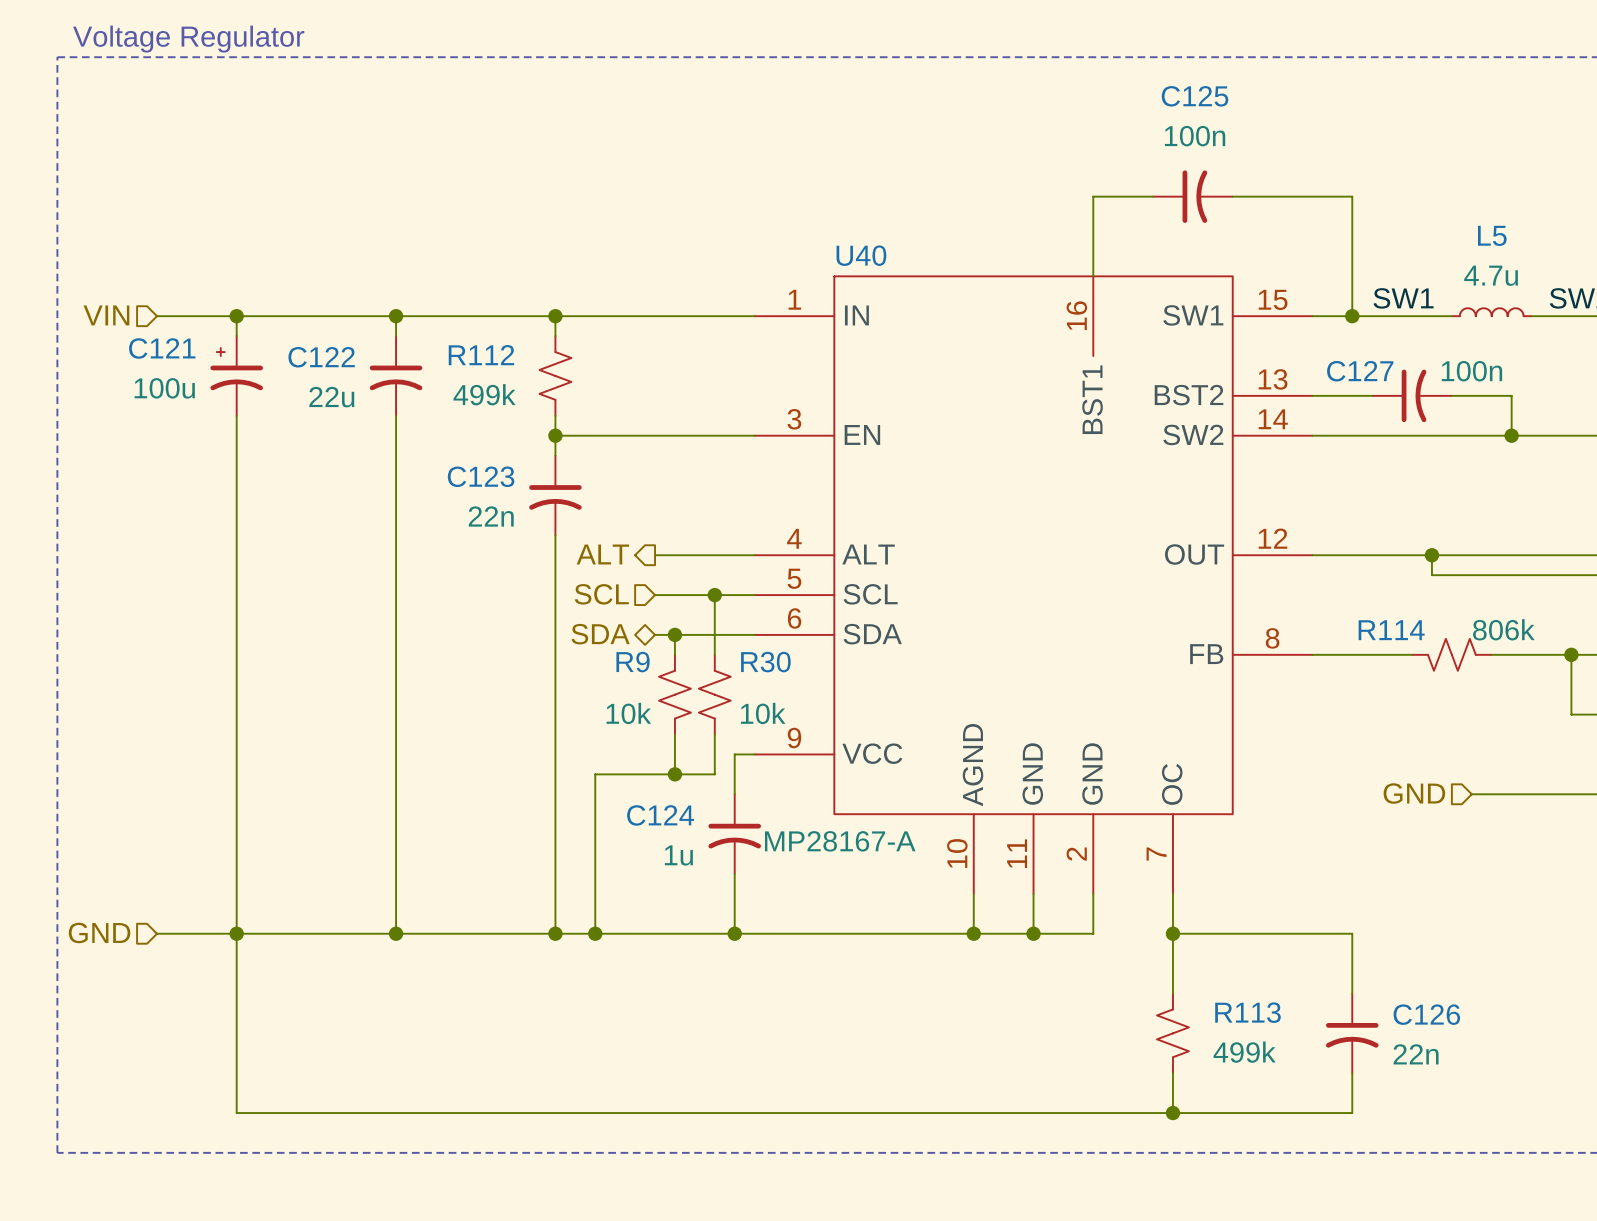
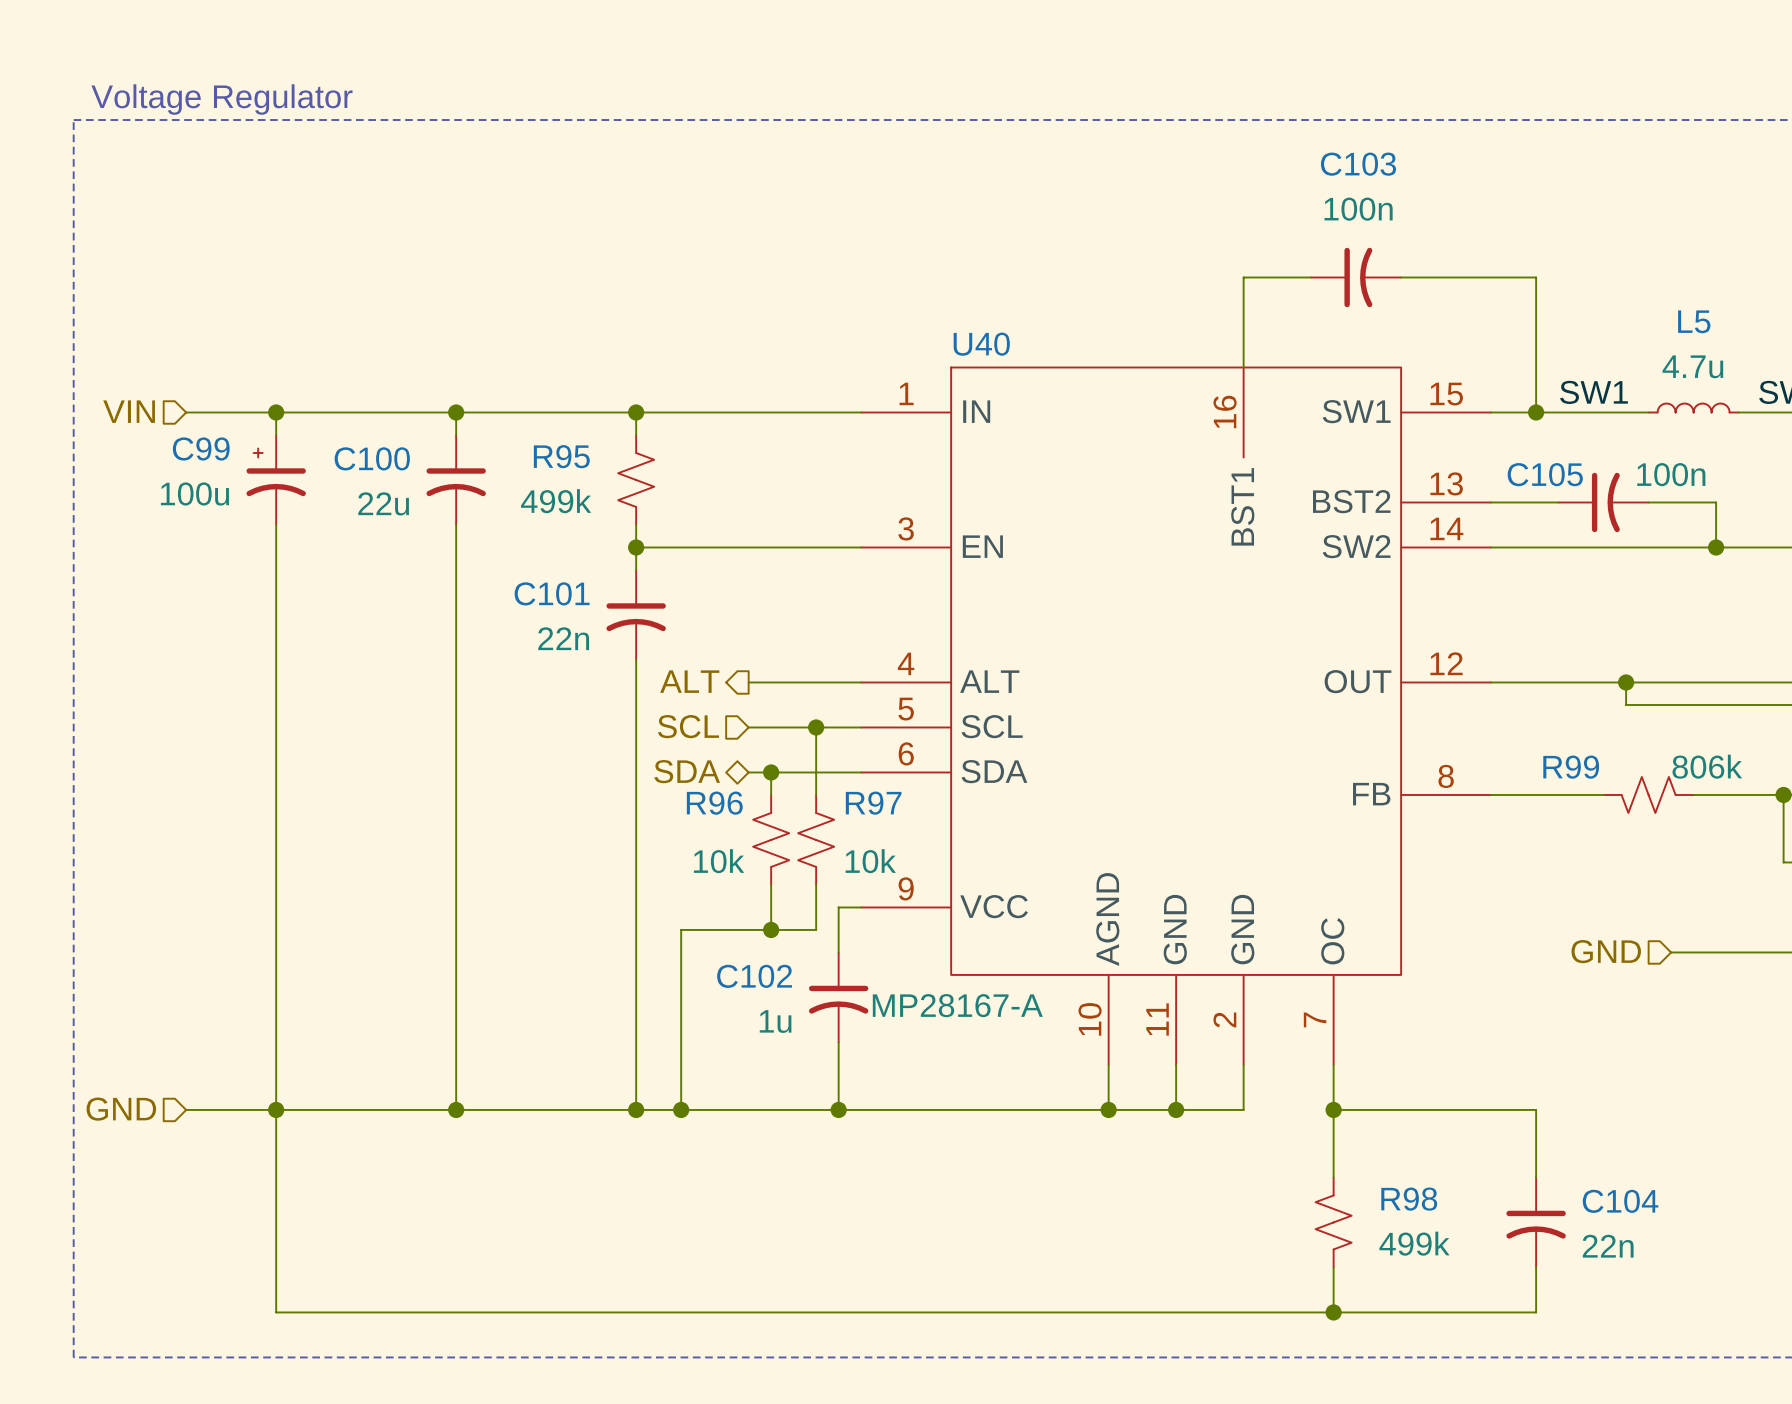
C125 name: C125 (1195, 96) -> C103 (1358, 164)
C121 name: C121 (162, 348) -> C99 (201, 448)
R112 name: R112 (481, 355) -> R95 (561, 456)
C122 name: C122 (321, 357) -> C100 (372, 458)
C127 name: C127 (1360, 371) -> C105 (1545, 474)
C123 name: C123 (481, 476) -> C101 (552, 593)
R114 name: R114 (1391, 630) -> R99 (1571, 767)
R9 name: R9 (633, 662) -> R96 (714, 803)
R30 name: R30 (765, 662) -> R97 (873, 803)
C124 name: C124 (660, 815) -> C102 (754, 976)
R113 name: R113 (1247, 1012) -> R98 (1409, 1199)
C126 name: C126 (1426, 1014) -> C104 (1620, 1201)

